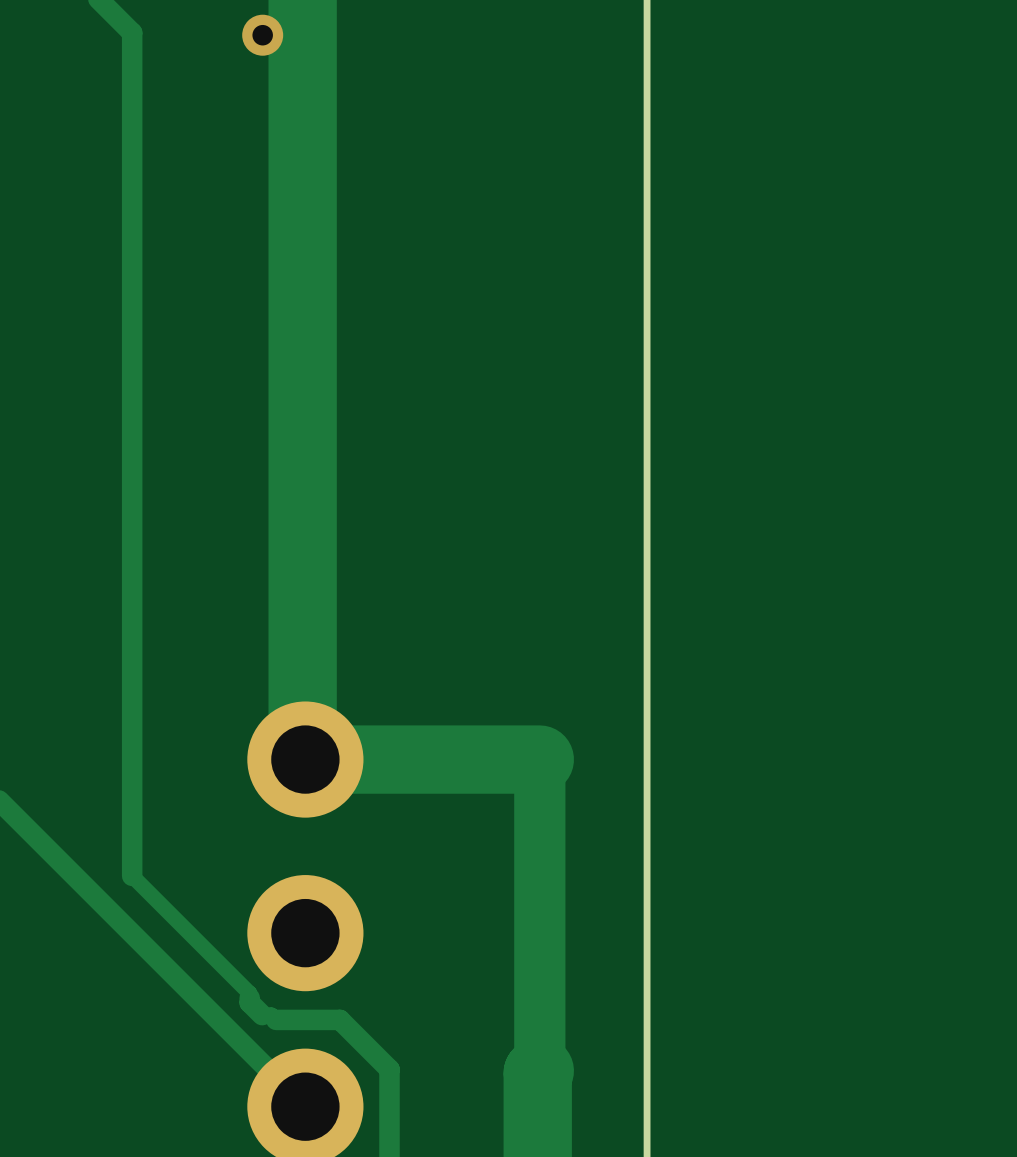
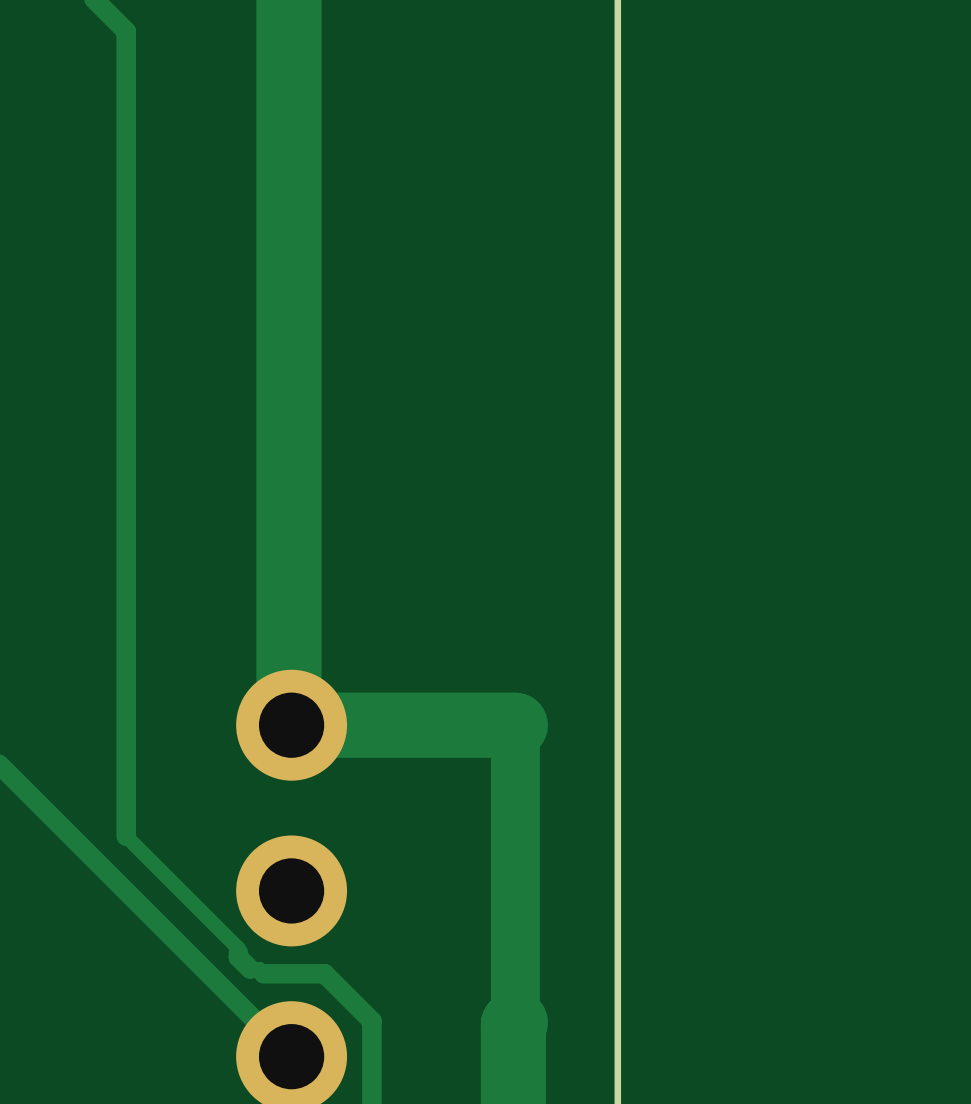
via: (262, 35) -> none

